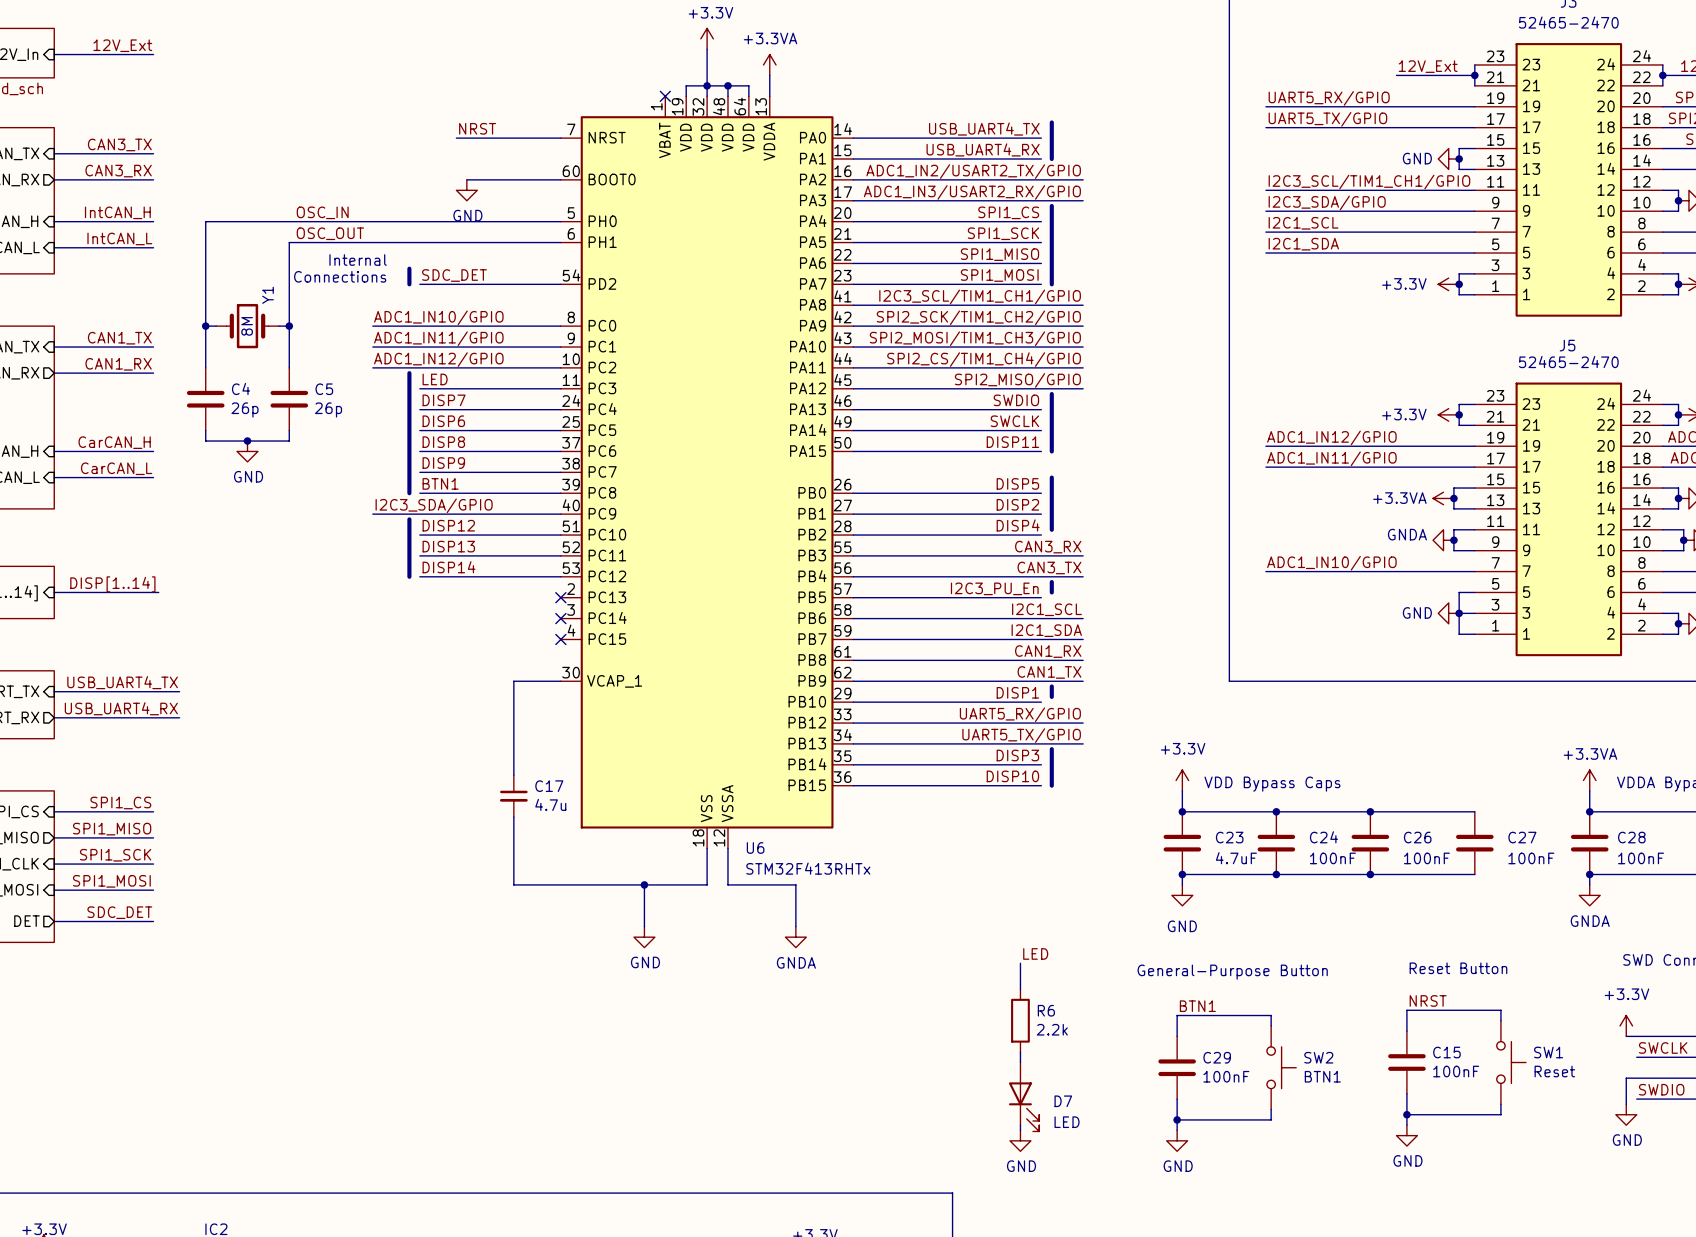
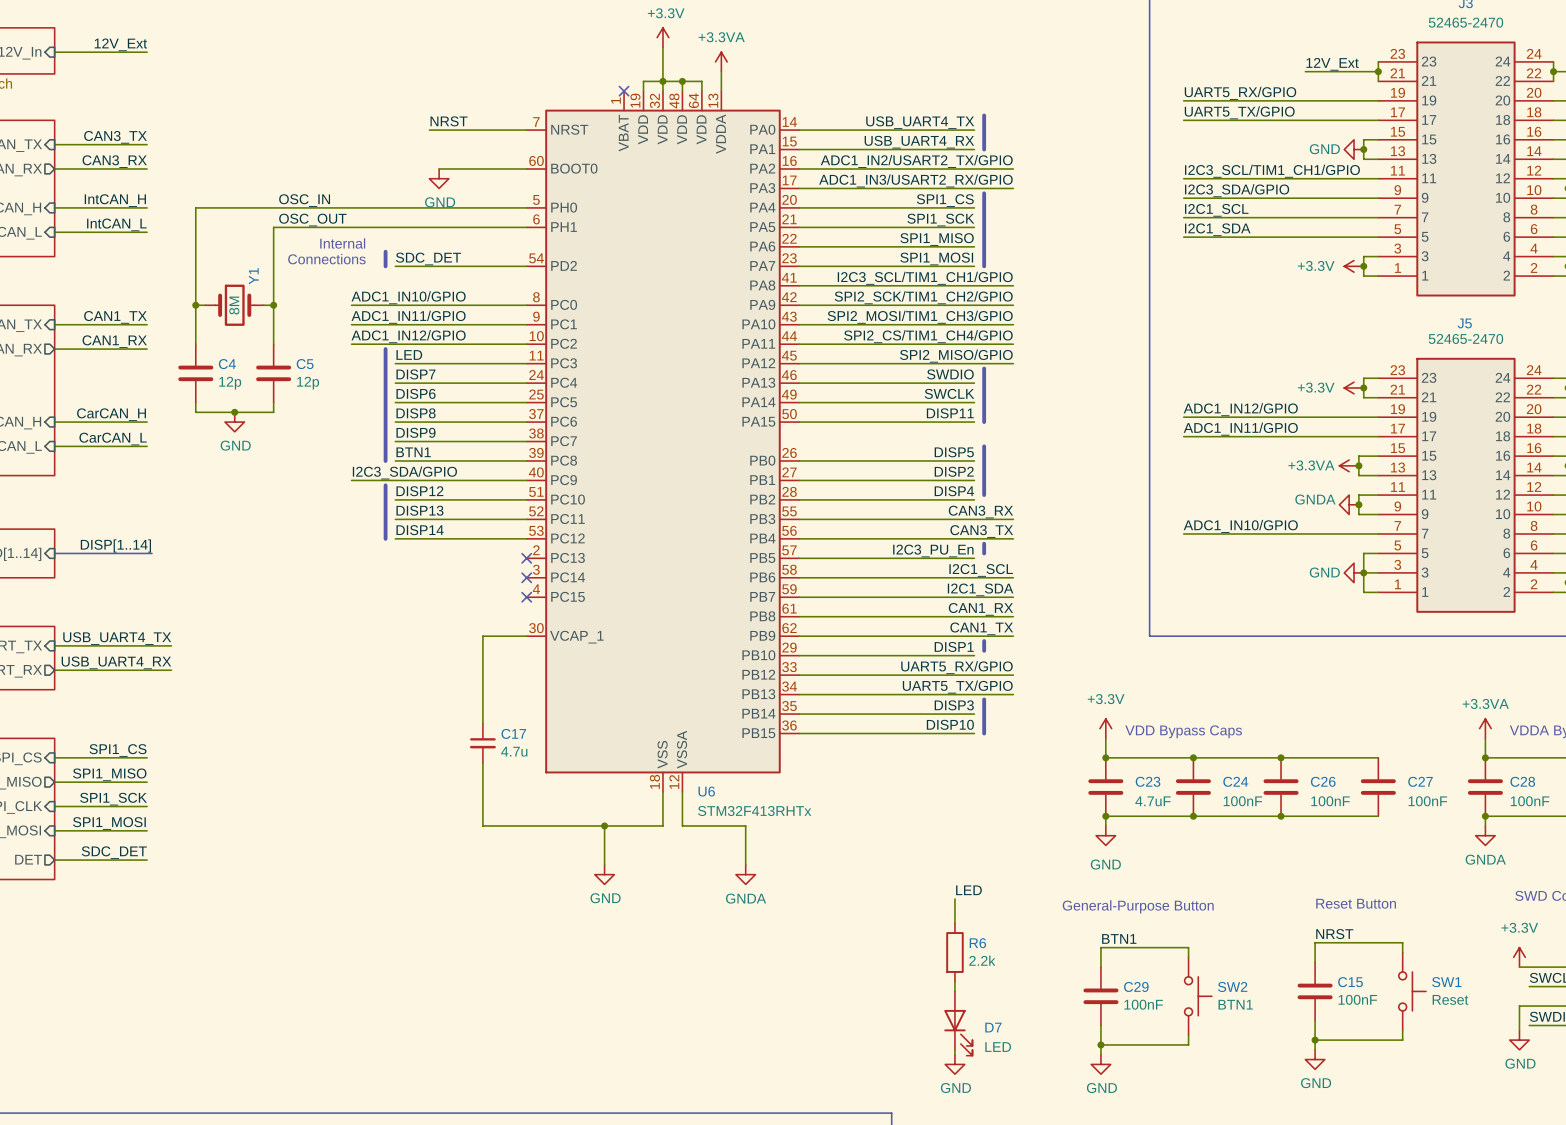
C4 value: 26p (244, 409) -> 12p (230, 383)
C5 value: 26p (328, 409) -> 12p (308, 383)

